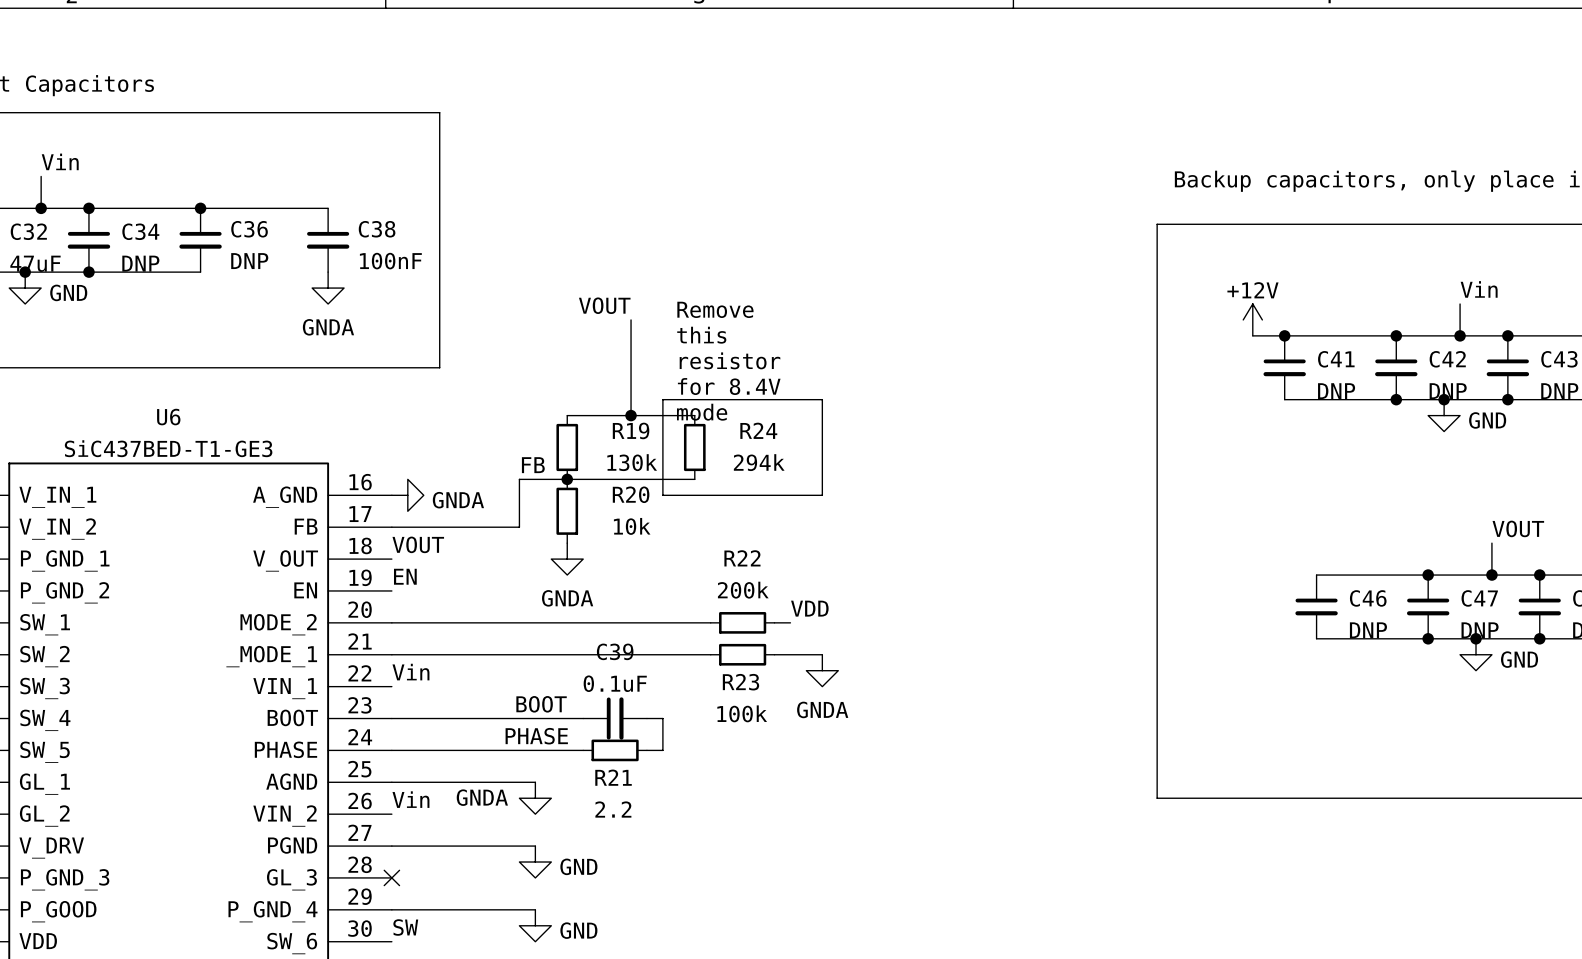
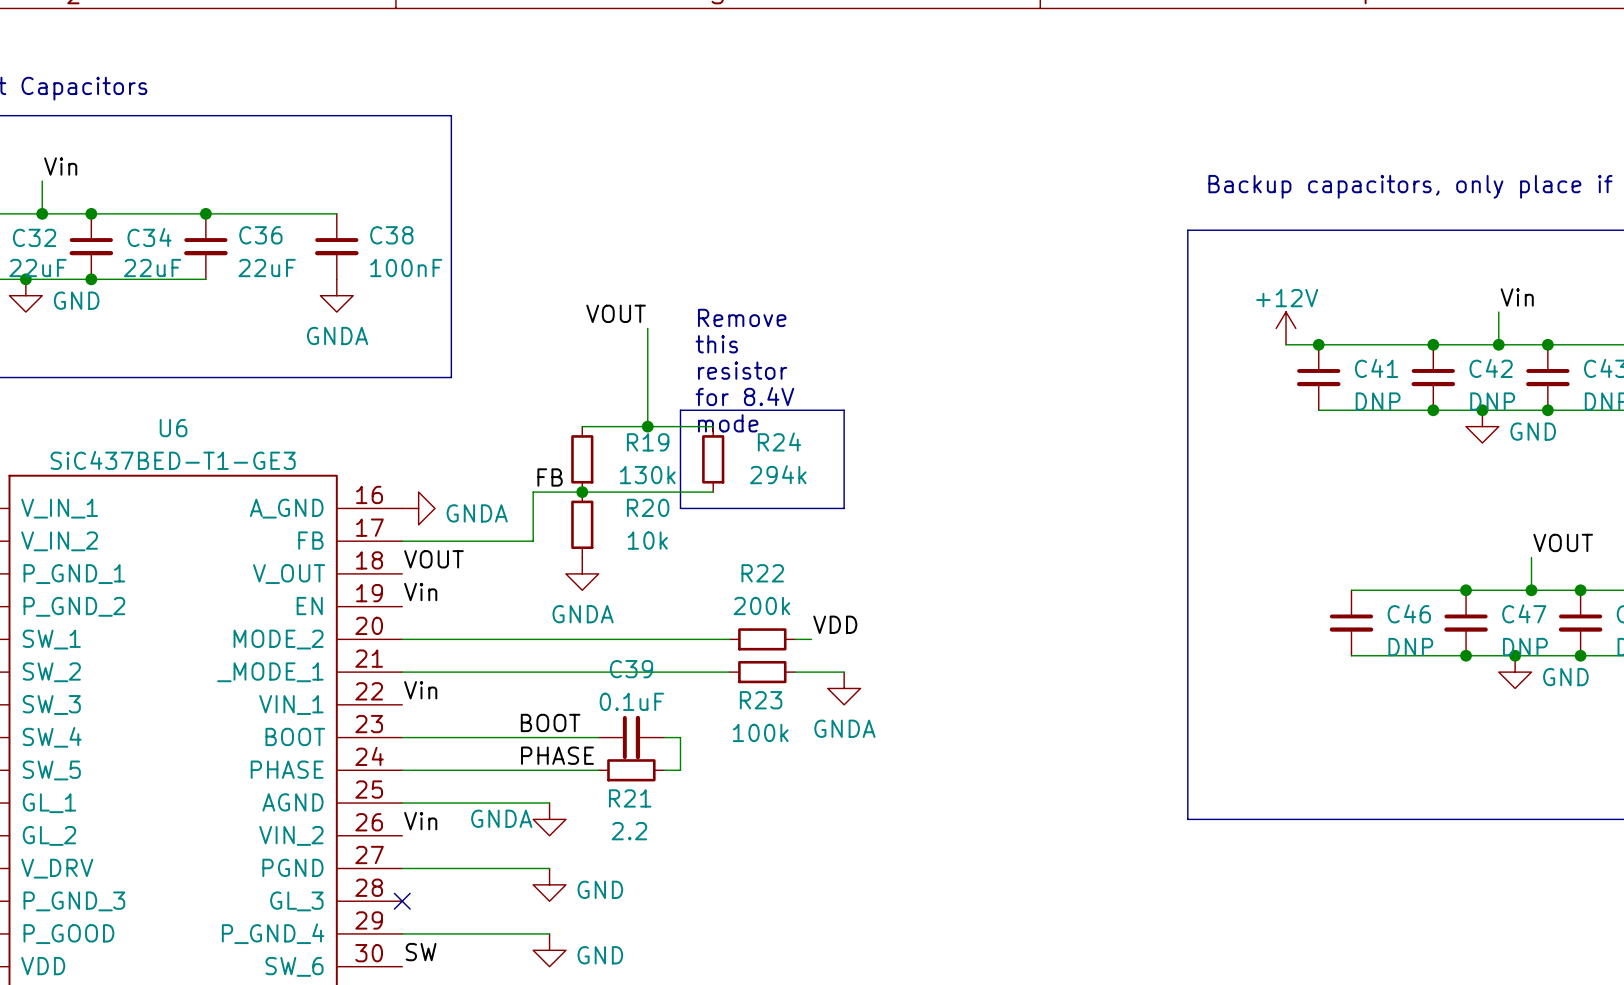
C36 value: DNP (249, 261) -> 22uF (267, 268)
C32 value: 47uF (35, 263) -> 22uF (38, 268)
C34 value: DNP (140, 263) -> 22uF (152, 268)
label: EN (405, 576) -> Vin (420, 592)

